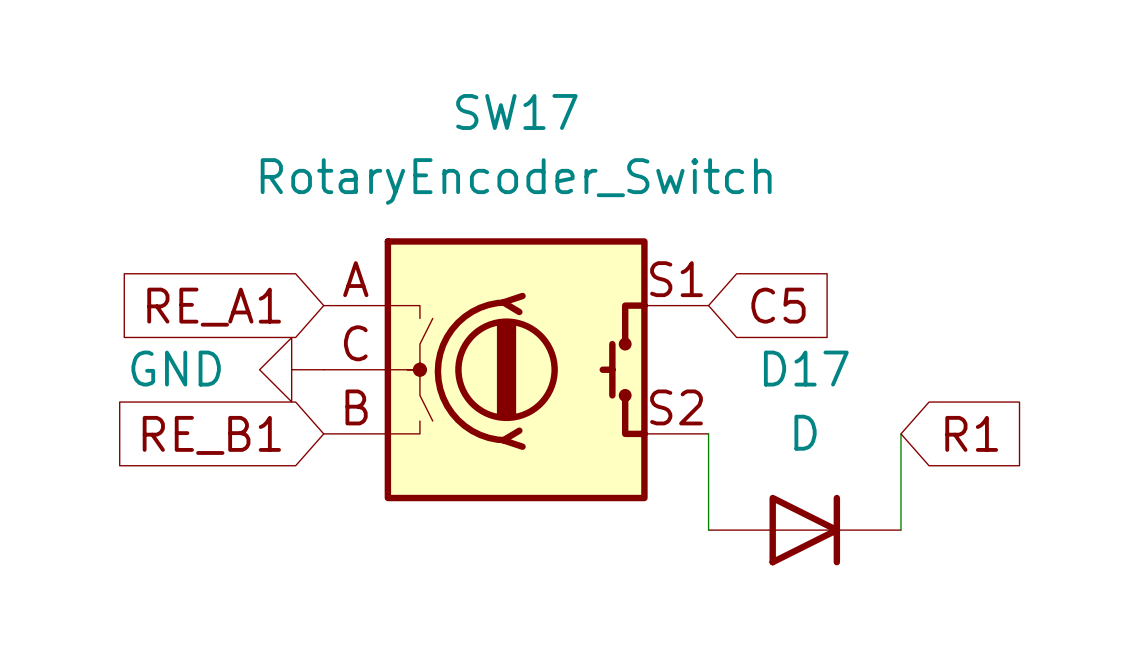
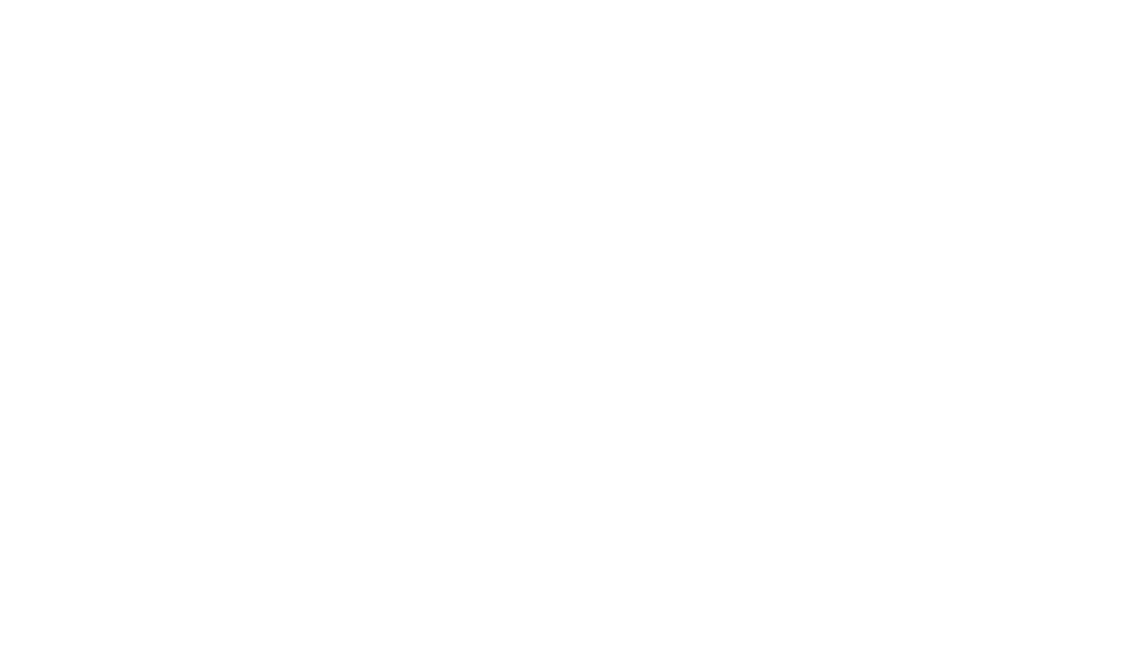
global label: C5 (778, 305) -> none
global label: RE_A1 (214, 307) -> none
power symbol: GND (291, 369) -> none
SW17: RotaryEncoder_Switch (516, 369) -> none
wire: (708, 433) (708, 530) -> none
wire: (900, 433) (900, 530) -> none
global label: R1 (971, 433) -> none
global label: RE_B1 (211, 435) -> none
D17: D (804, 530) -> none

